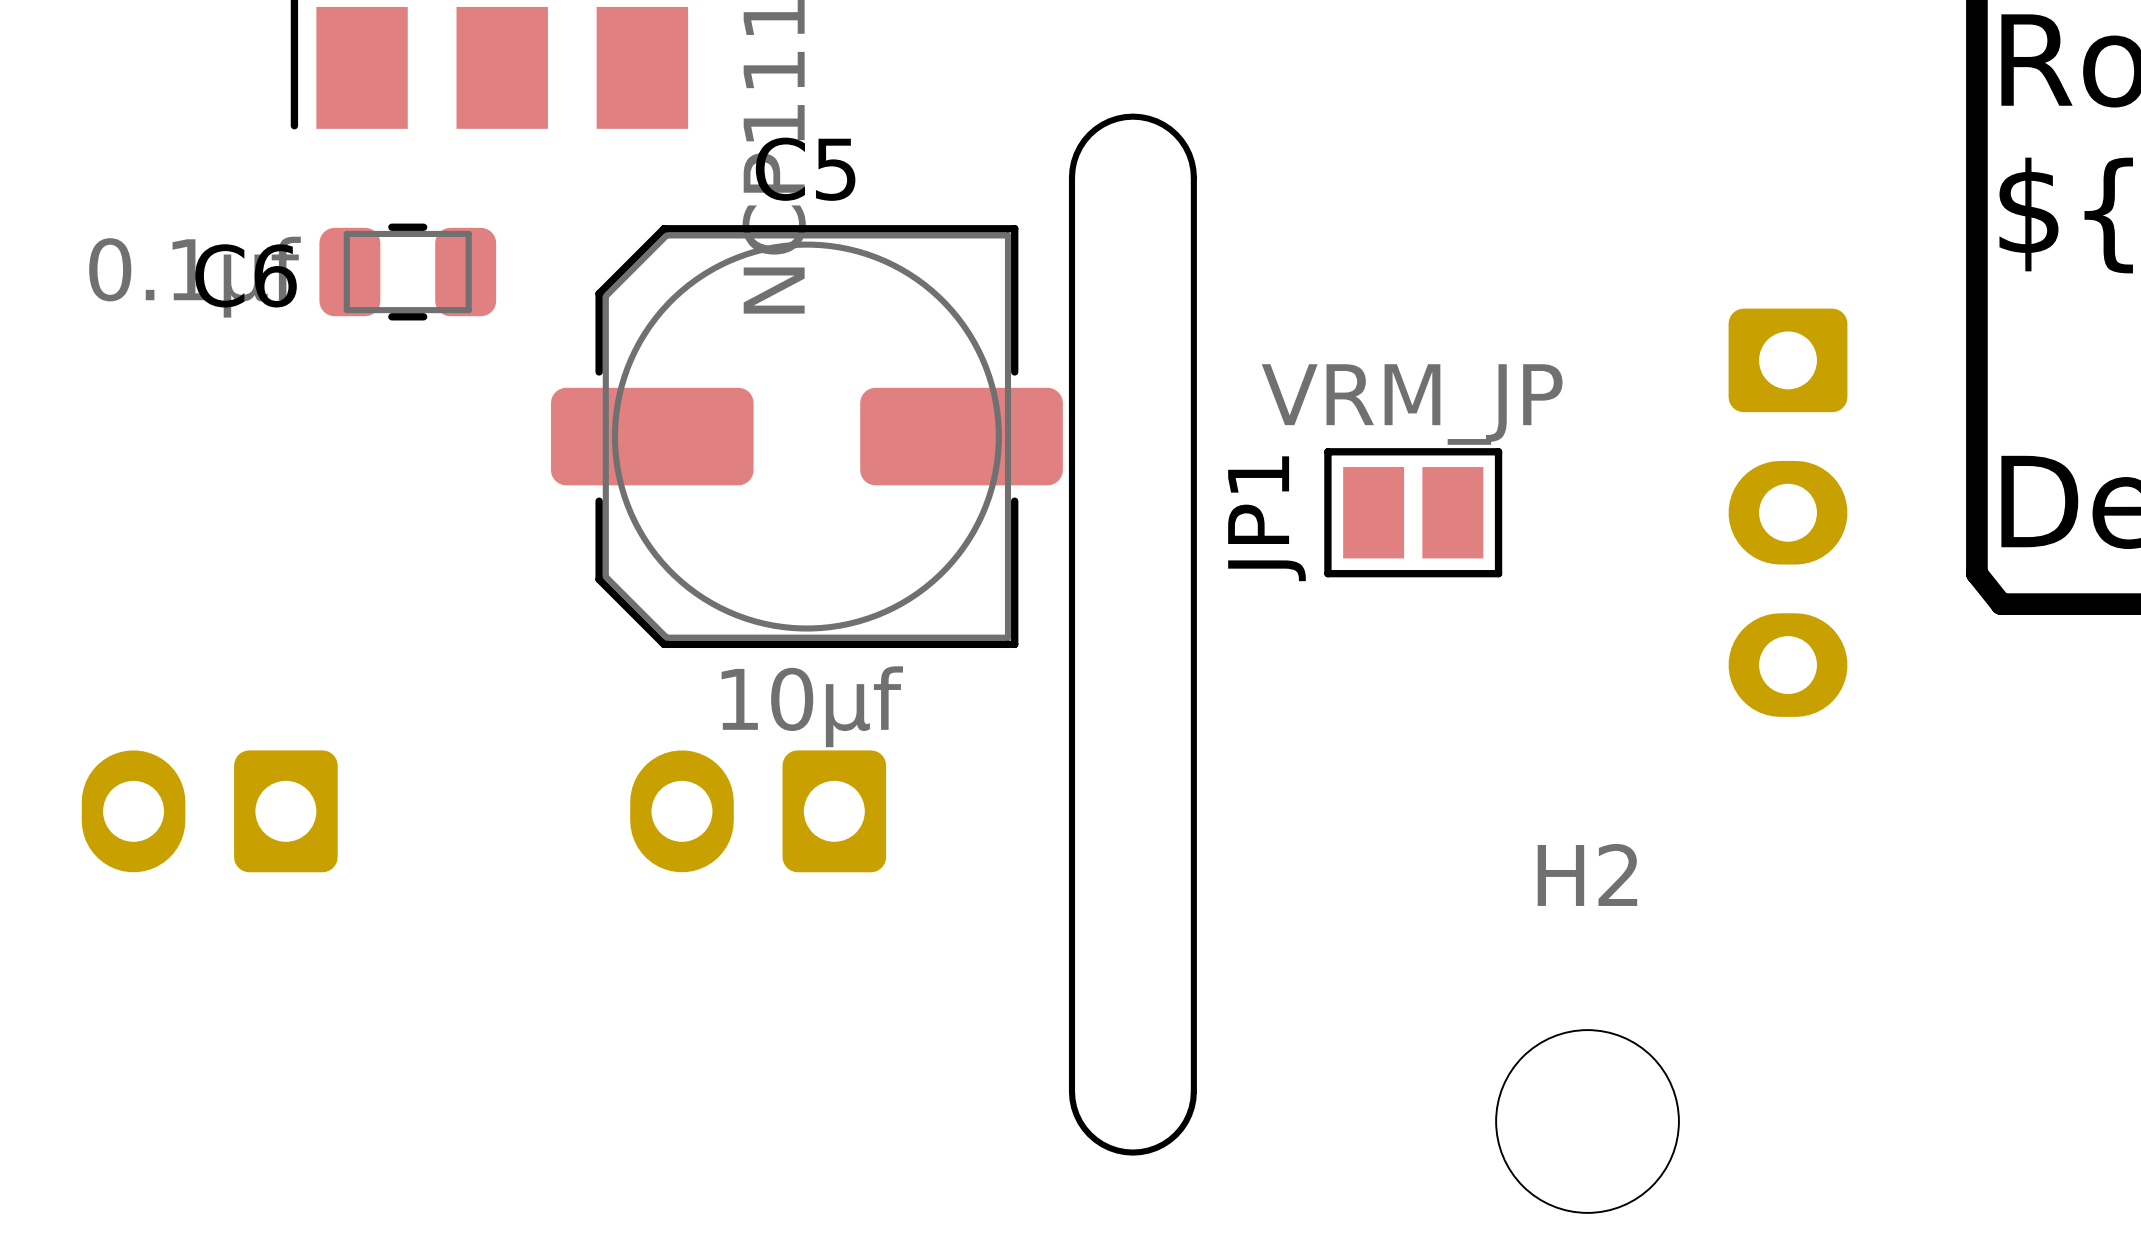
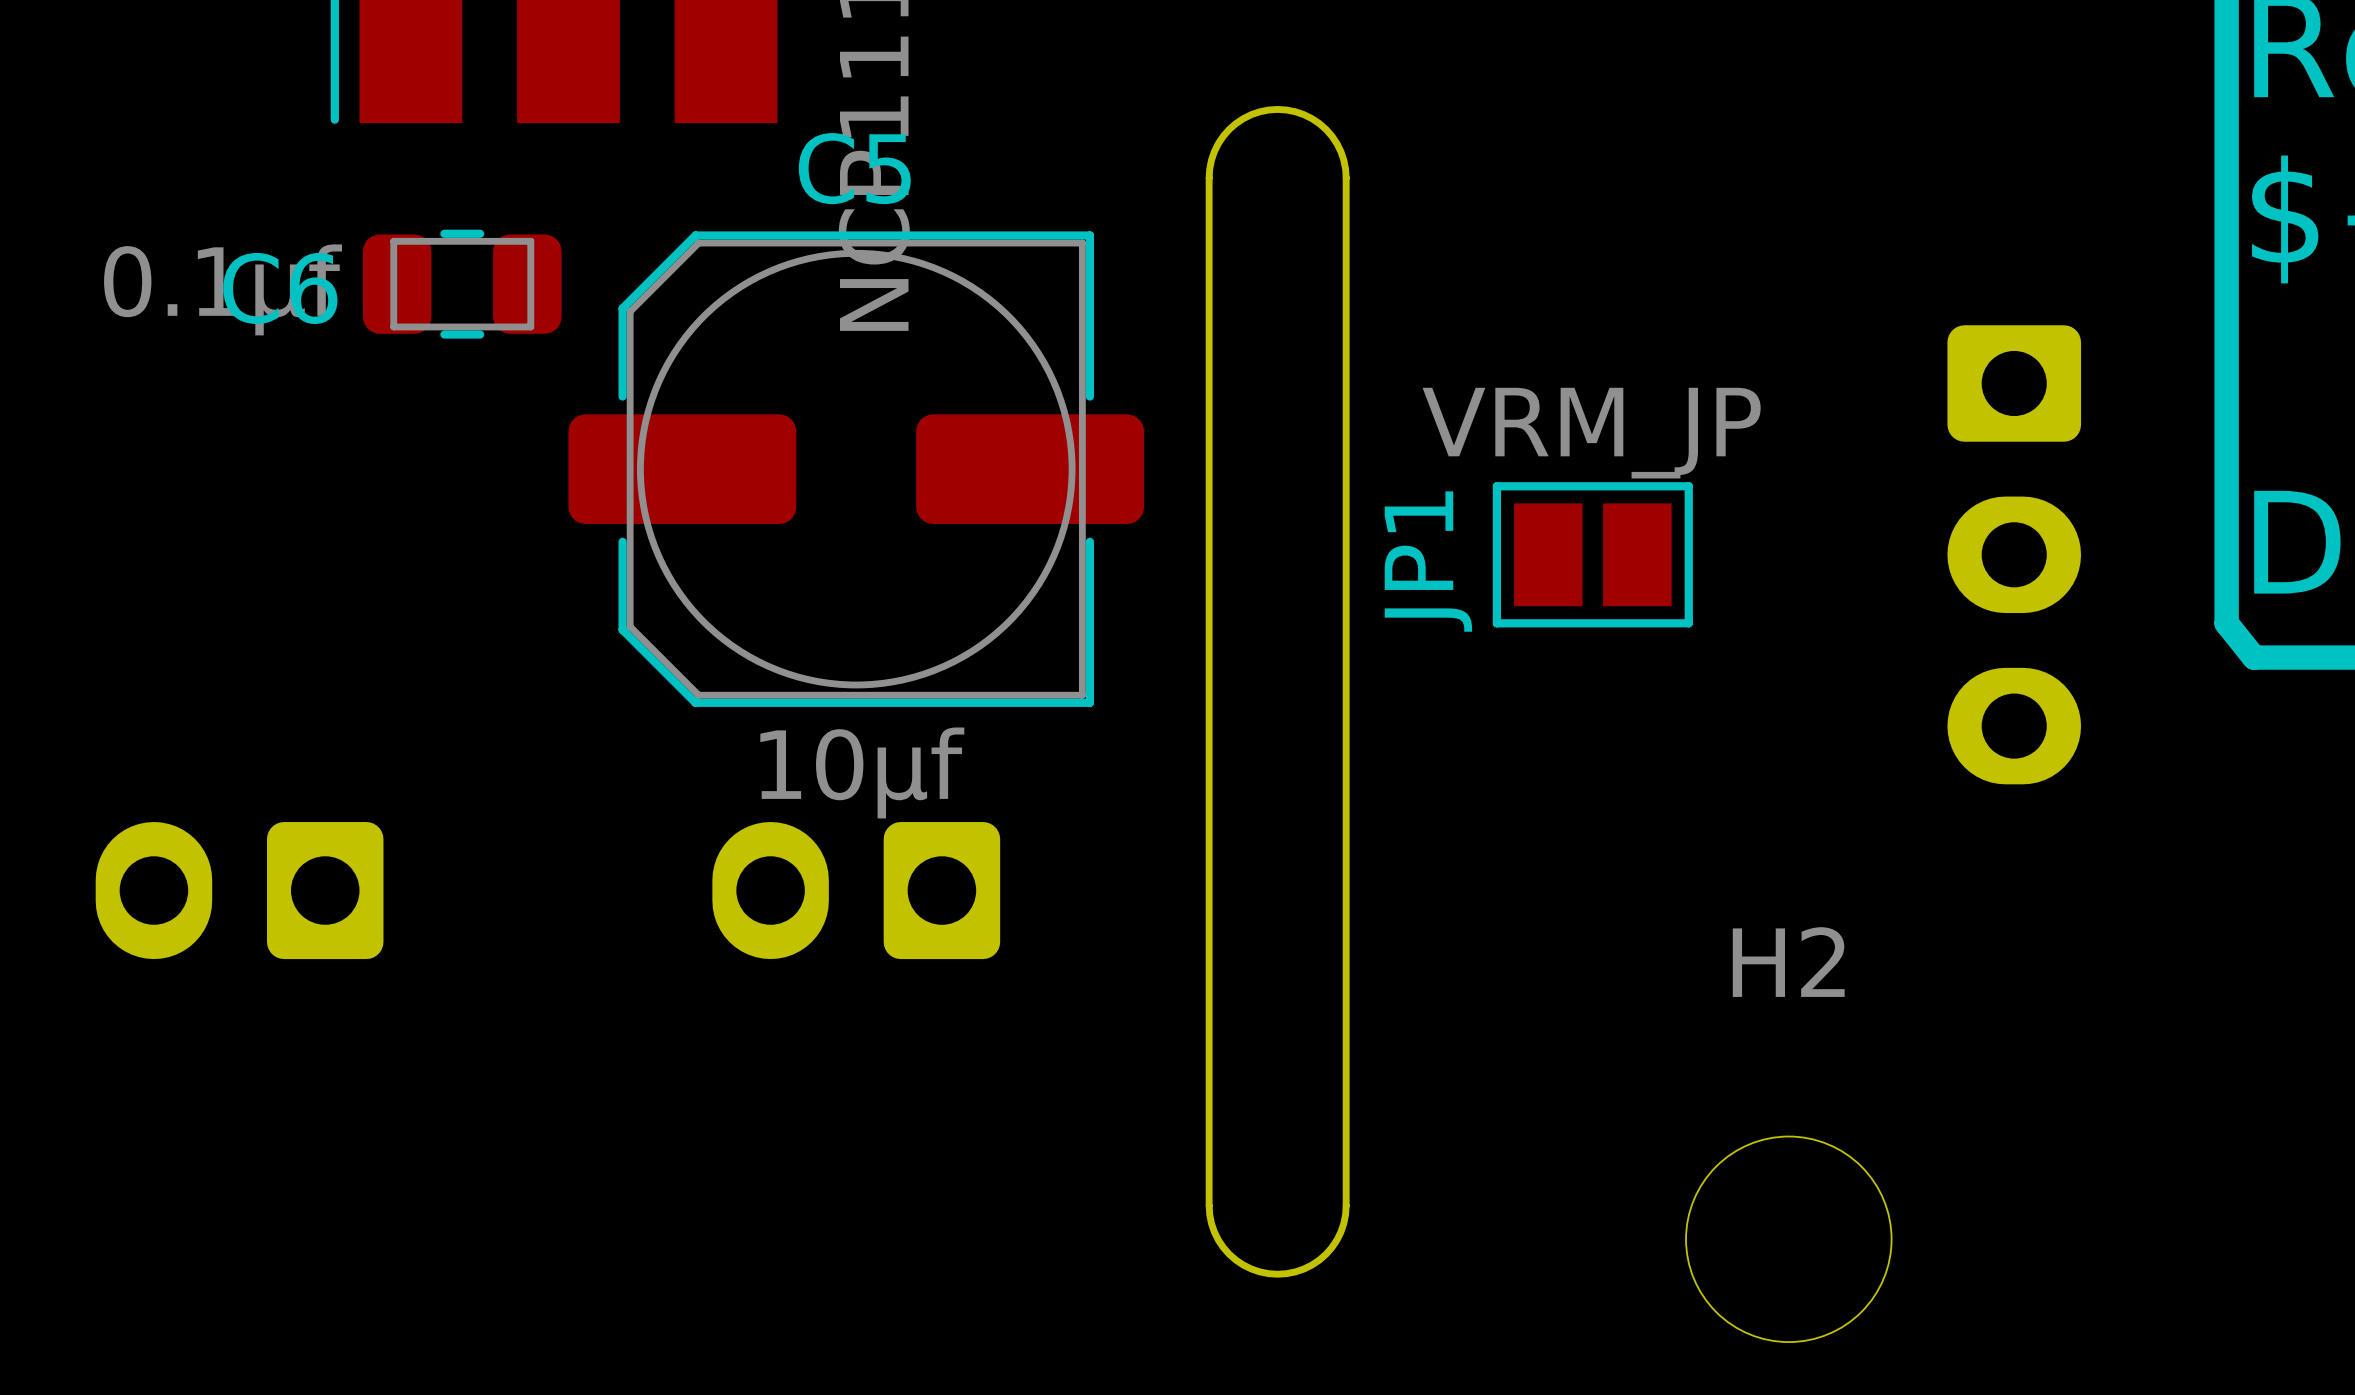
C5 position: (806, 436) -> (856, 469)

